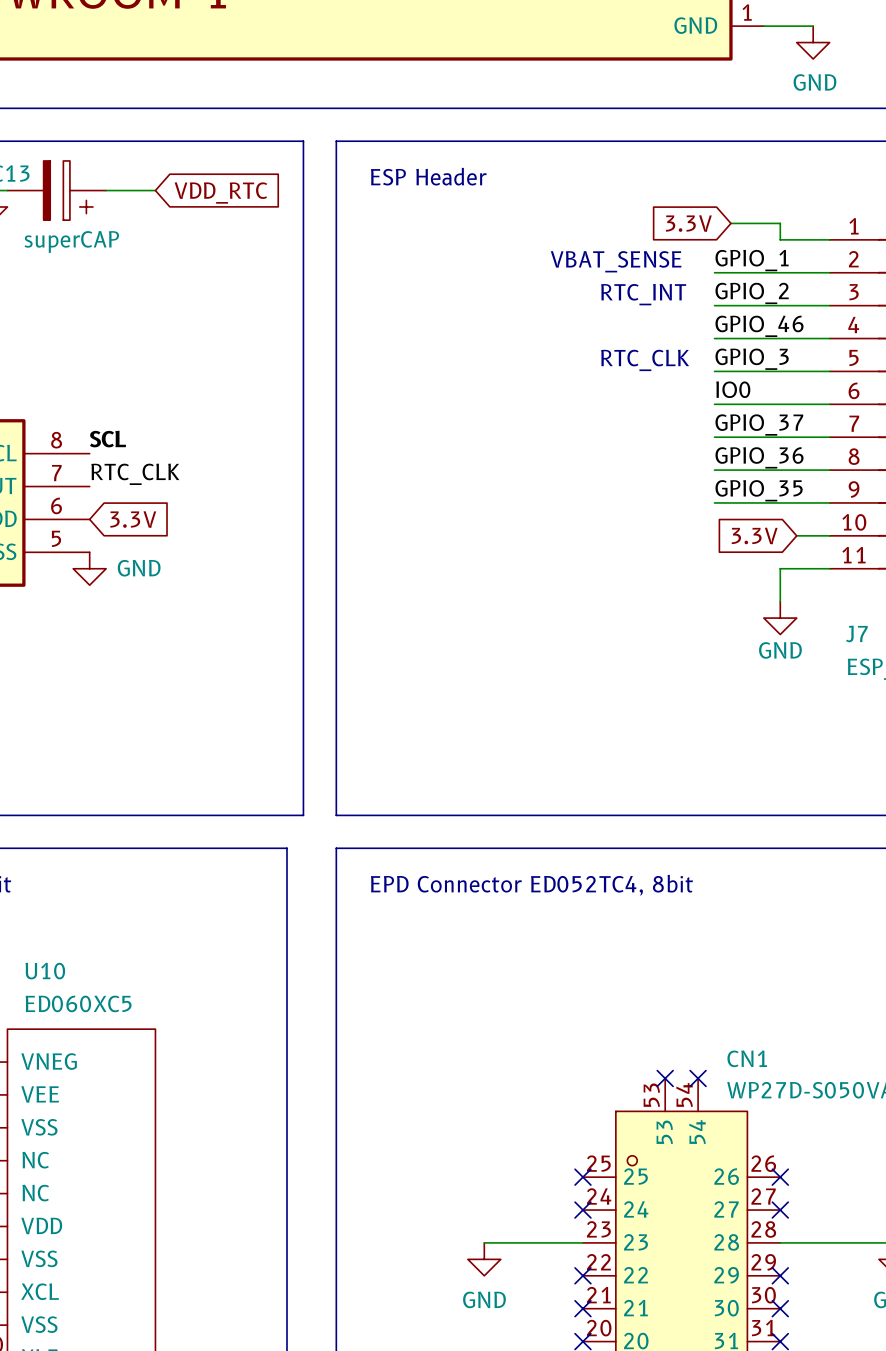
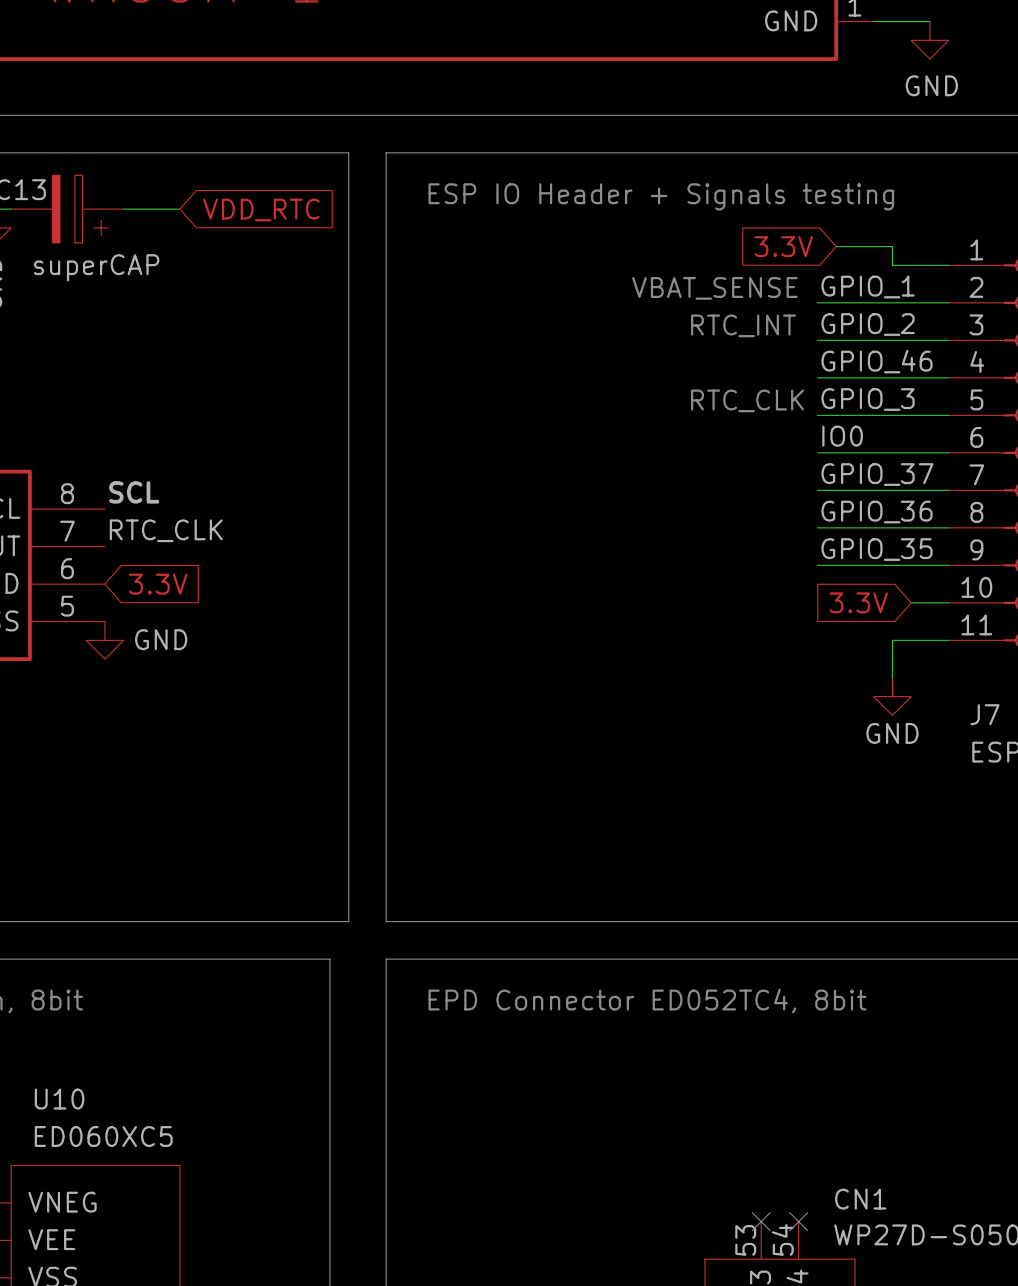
text: ESP Header (428, 176) -> ESP IO Header + Signals testing (661, 196)

